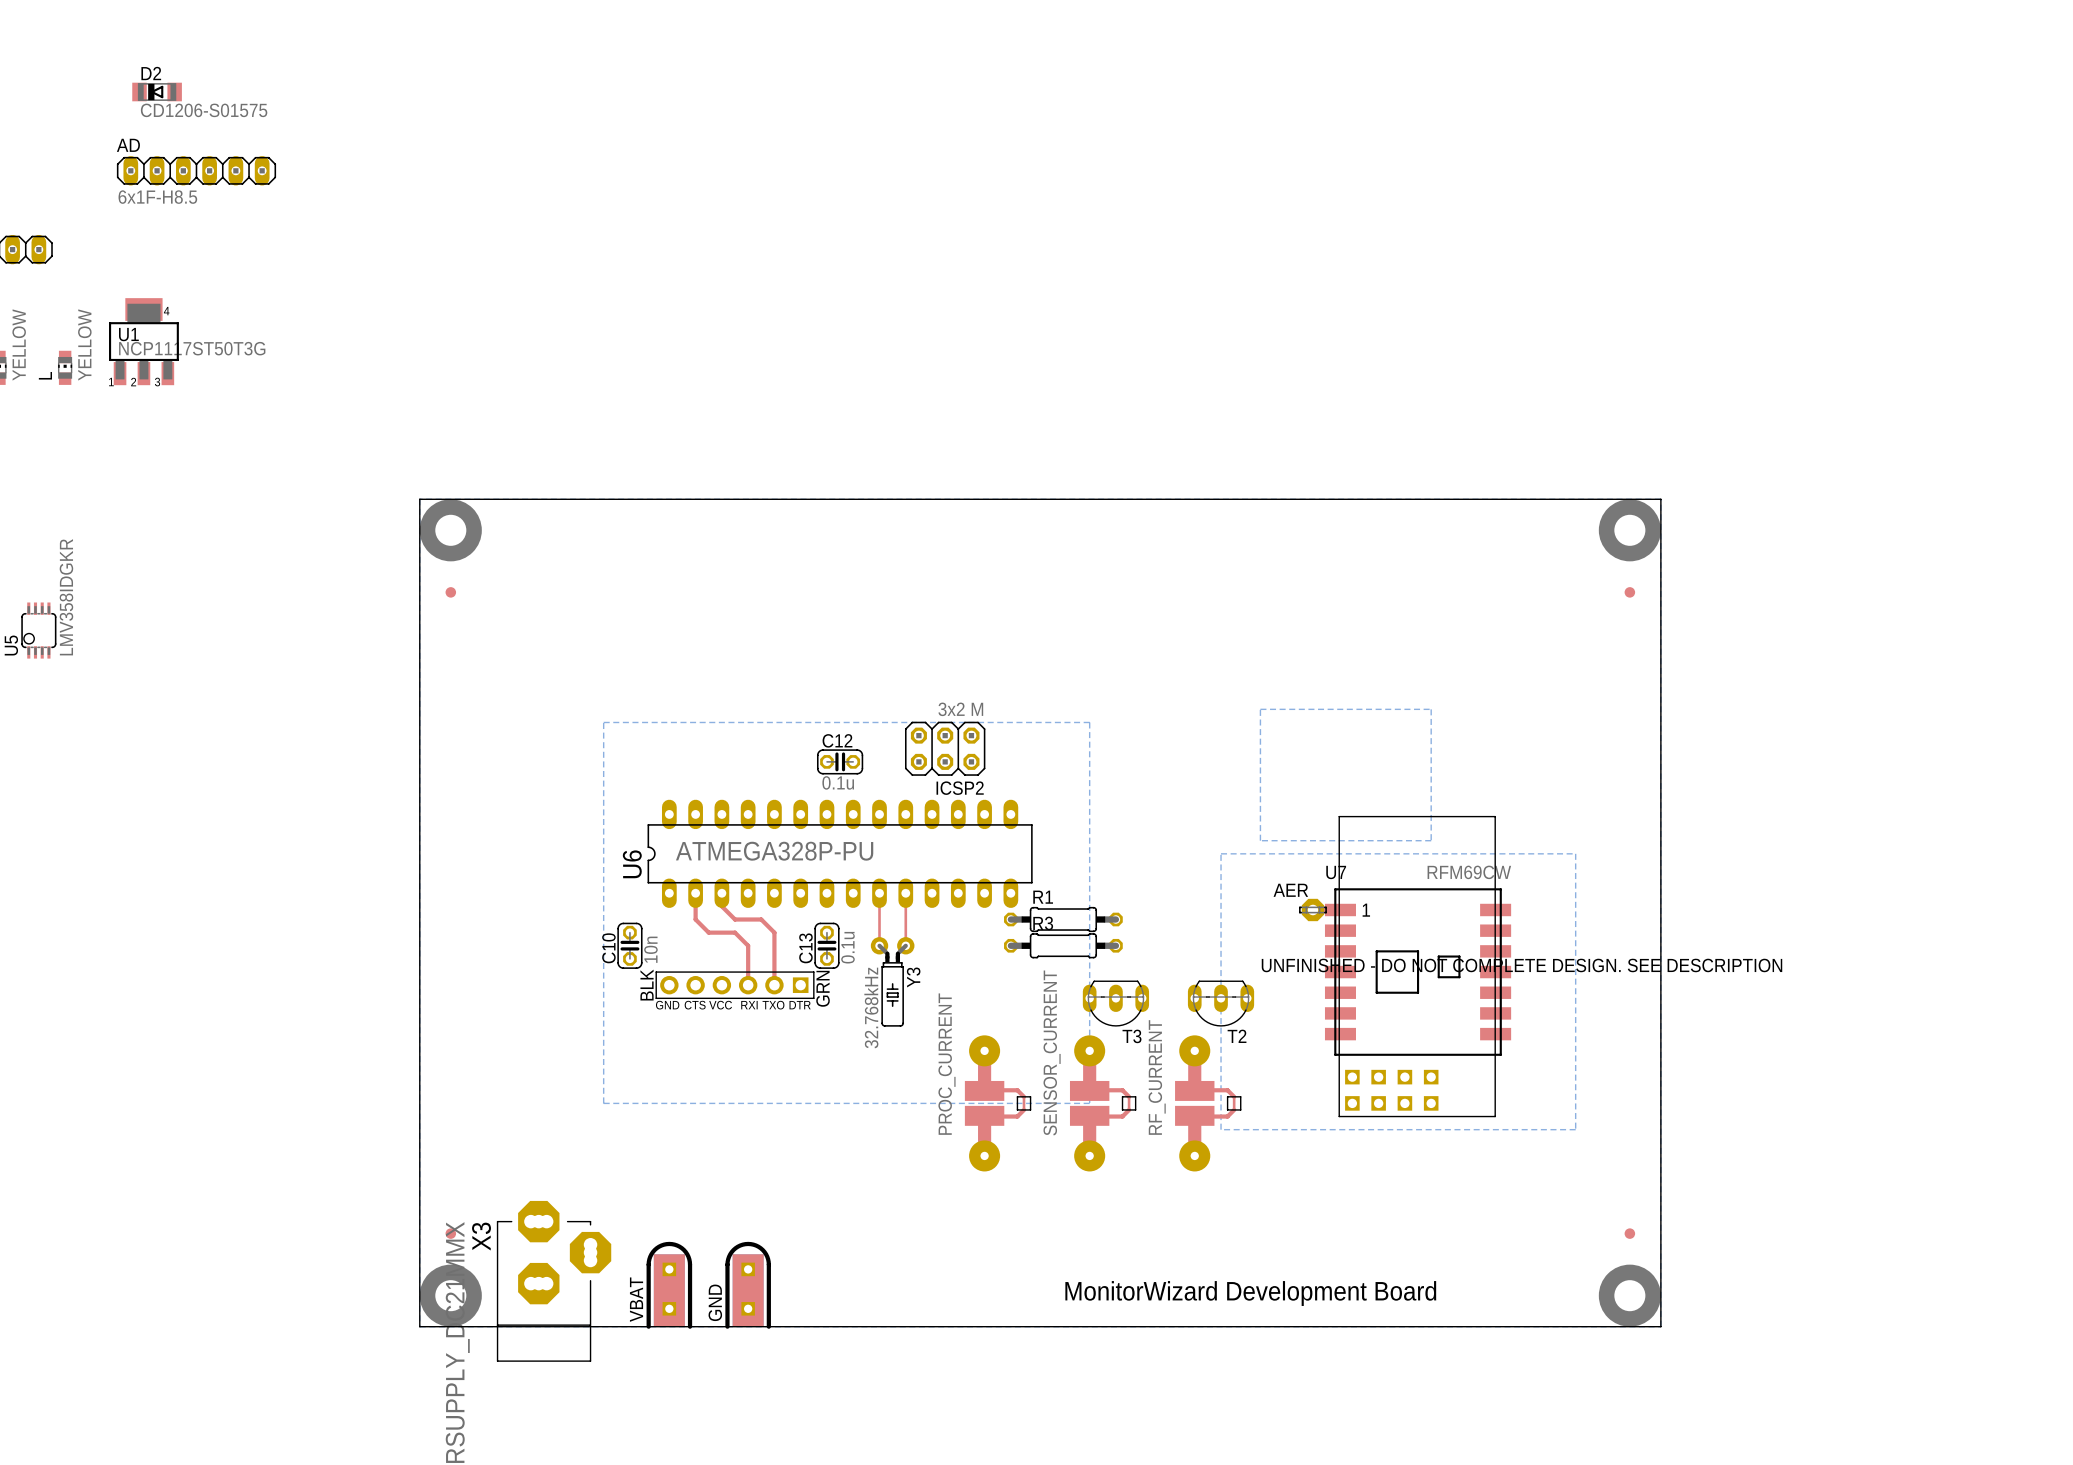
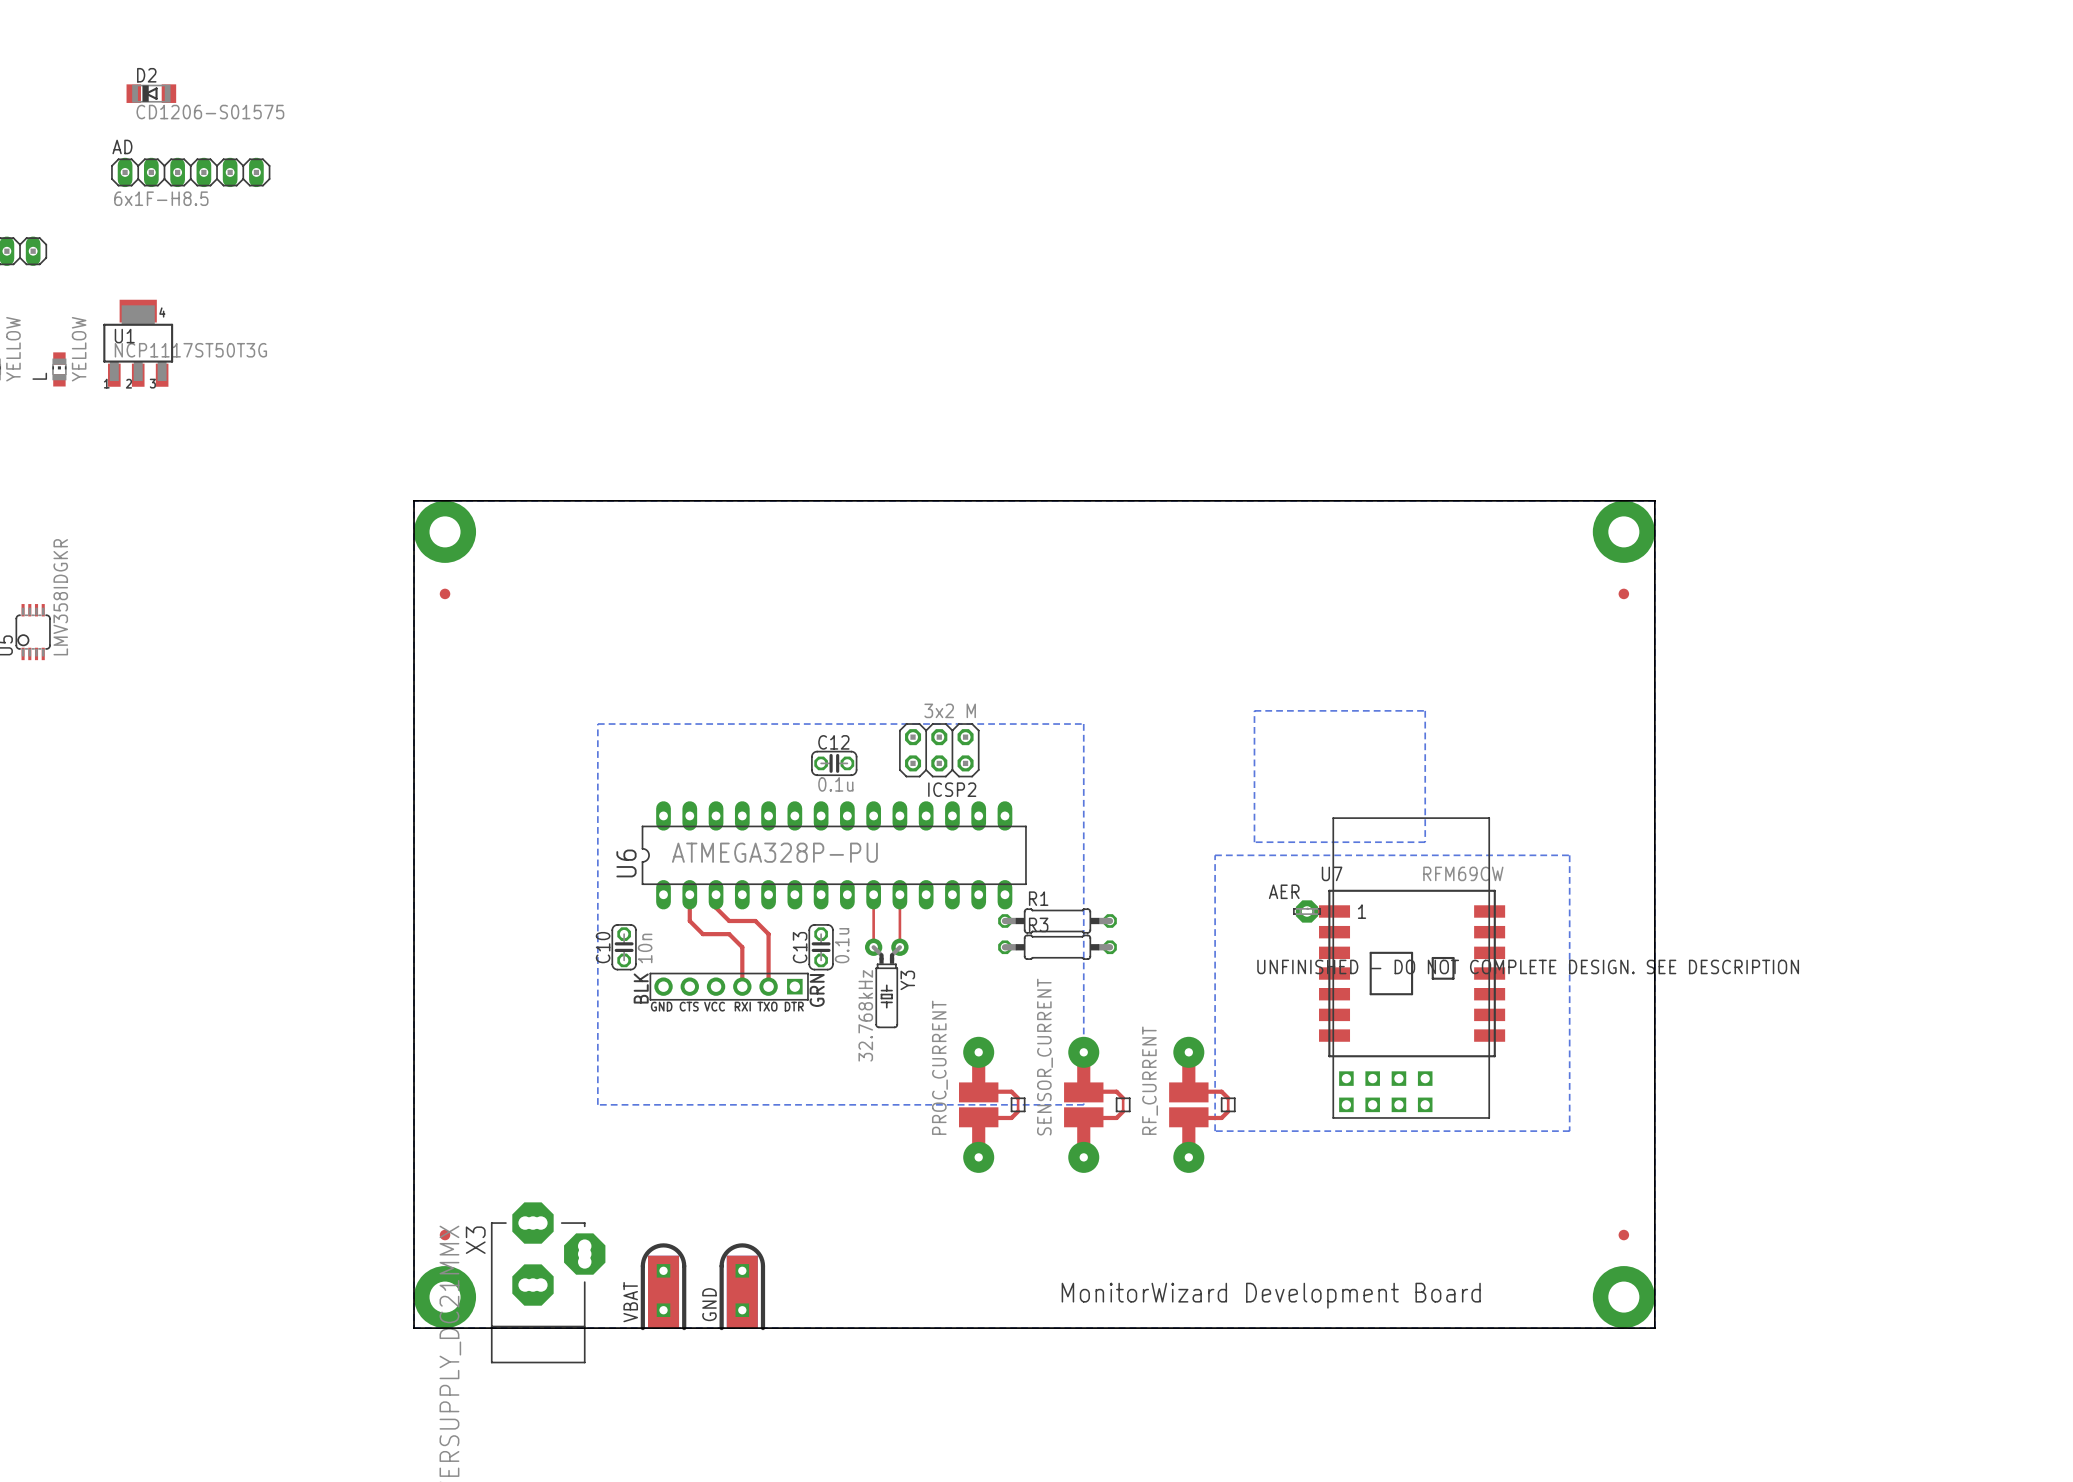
T3: (1115, 1003) -> none
T2: (1221, 1003) -> none

